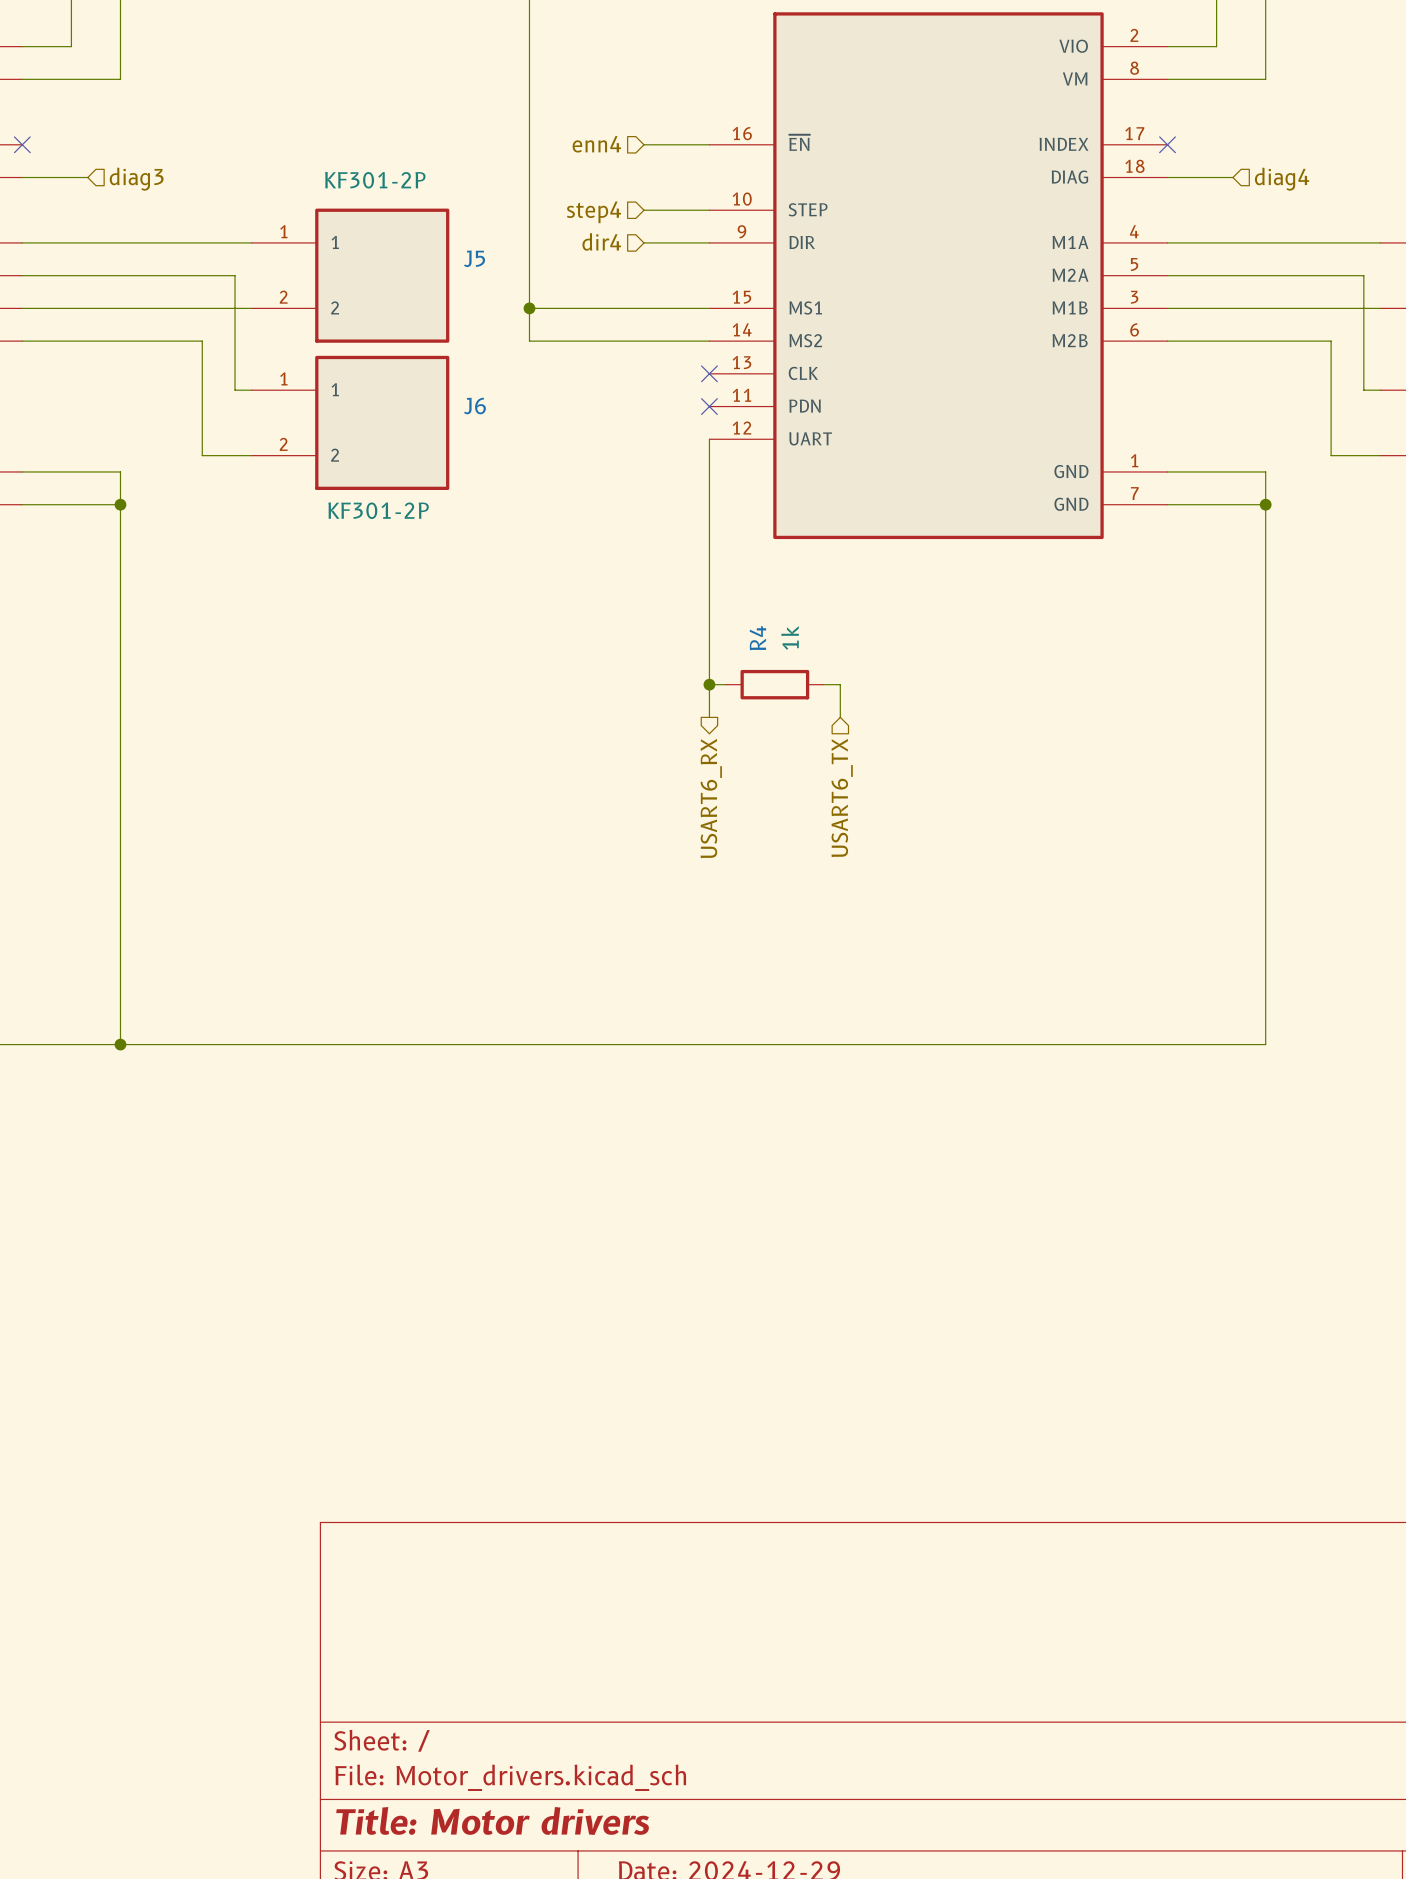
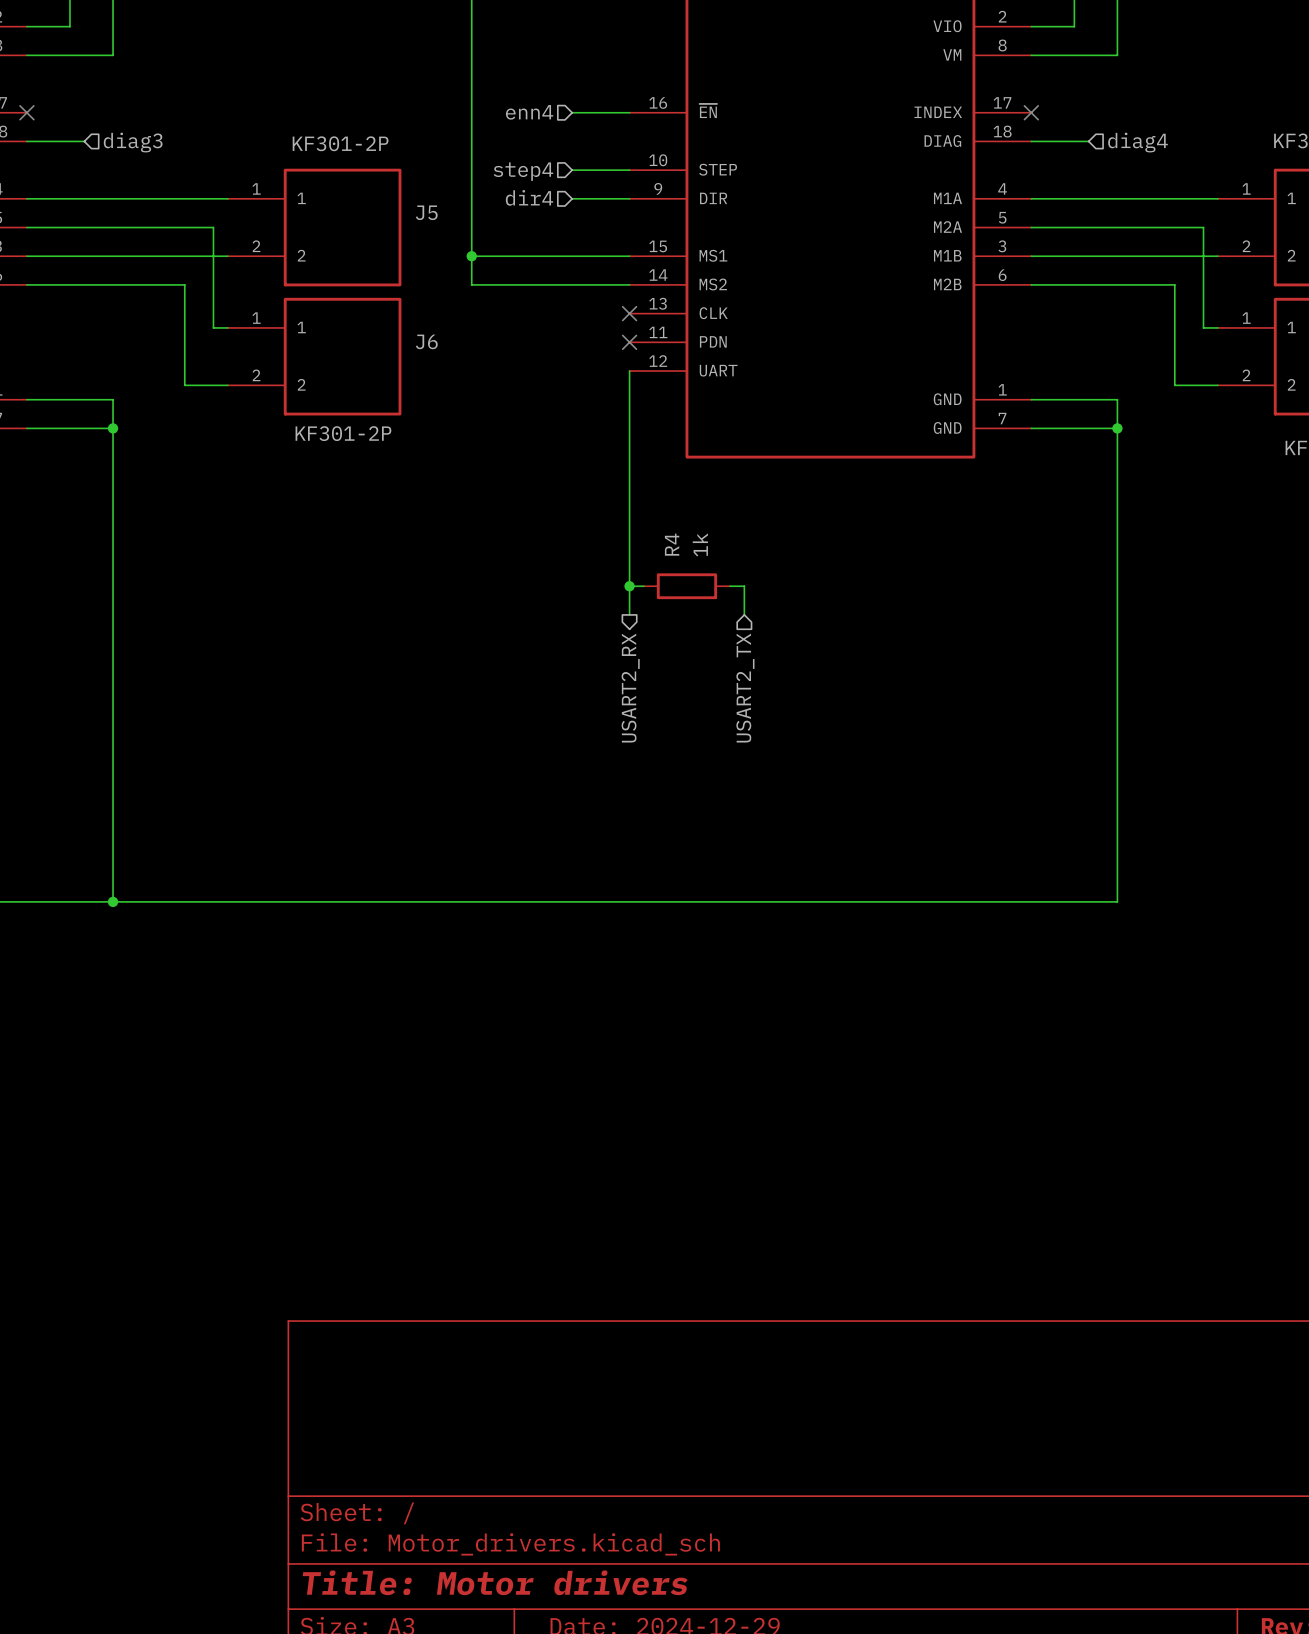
hierarchical label: USART6_TX (842, 797) -> USART2_TX (745, 688)
hierarchical label: USART6_RX (711, 798) -> USART2_RX (630, 688)

